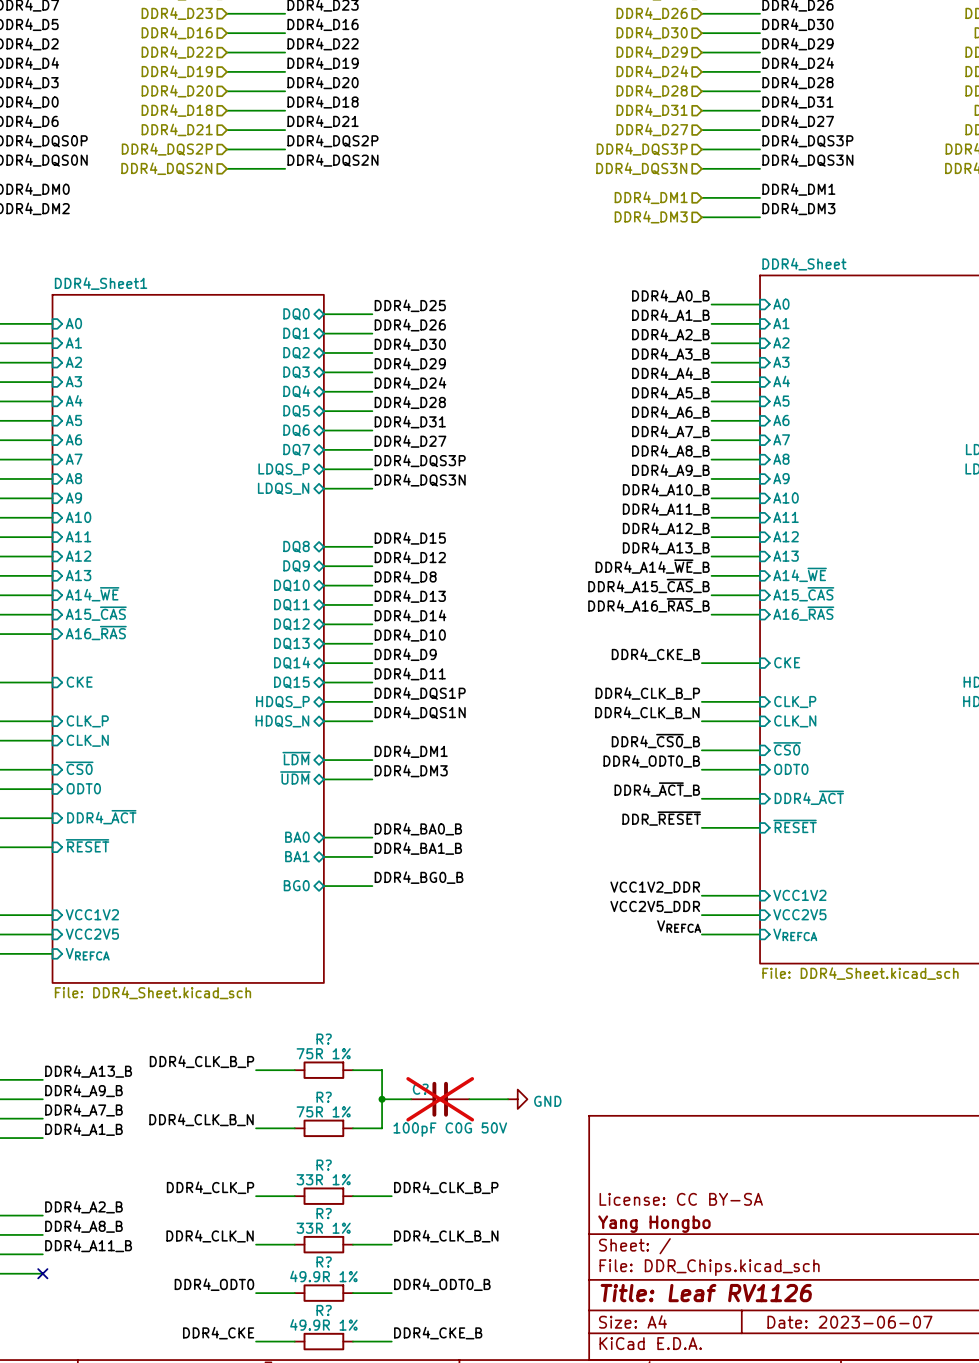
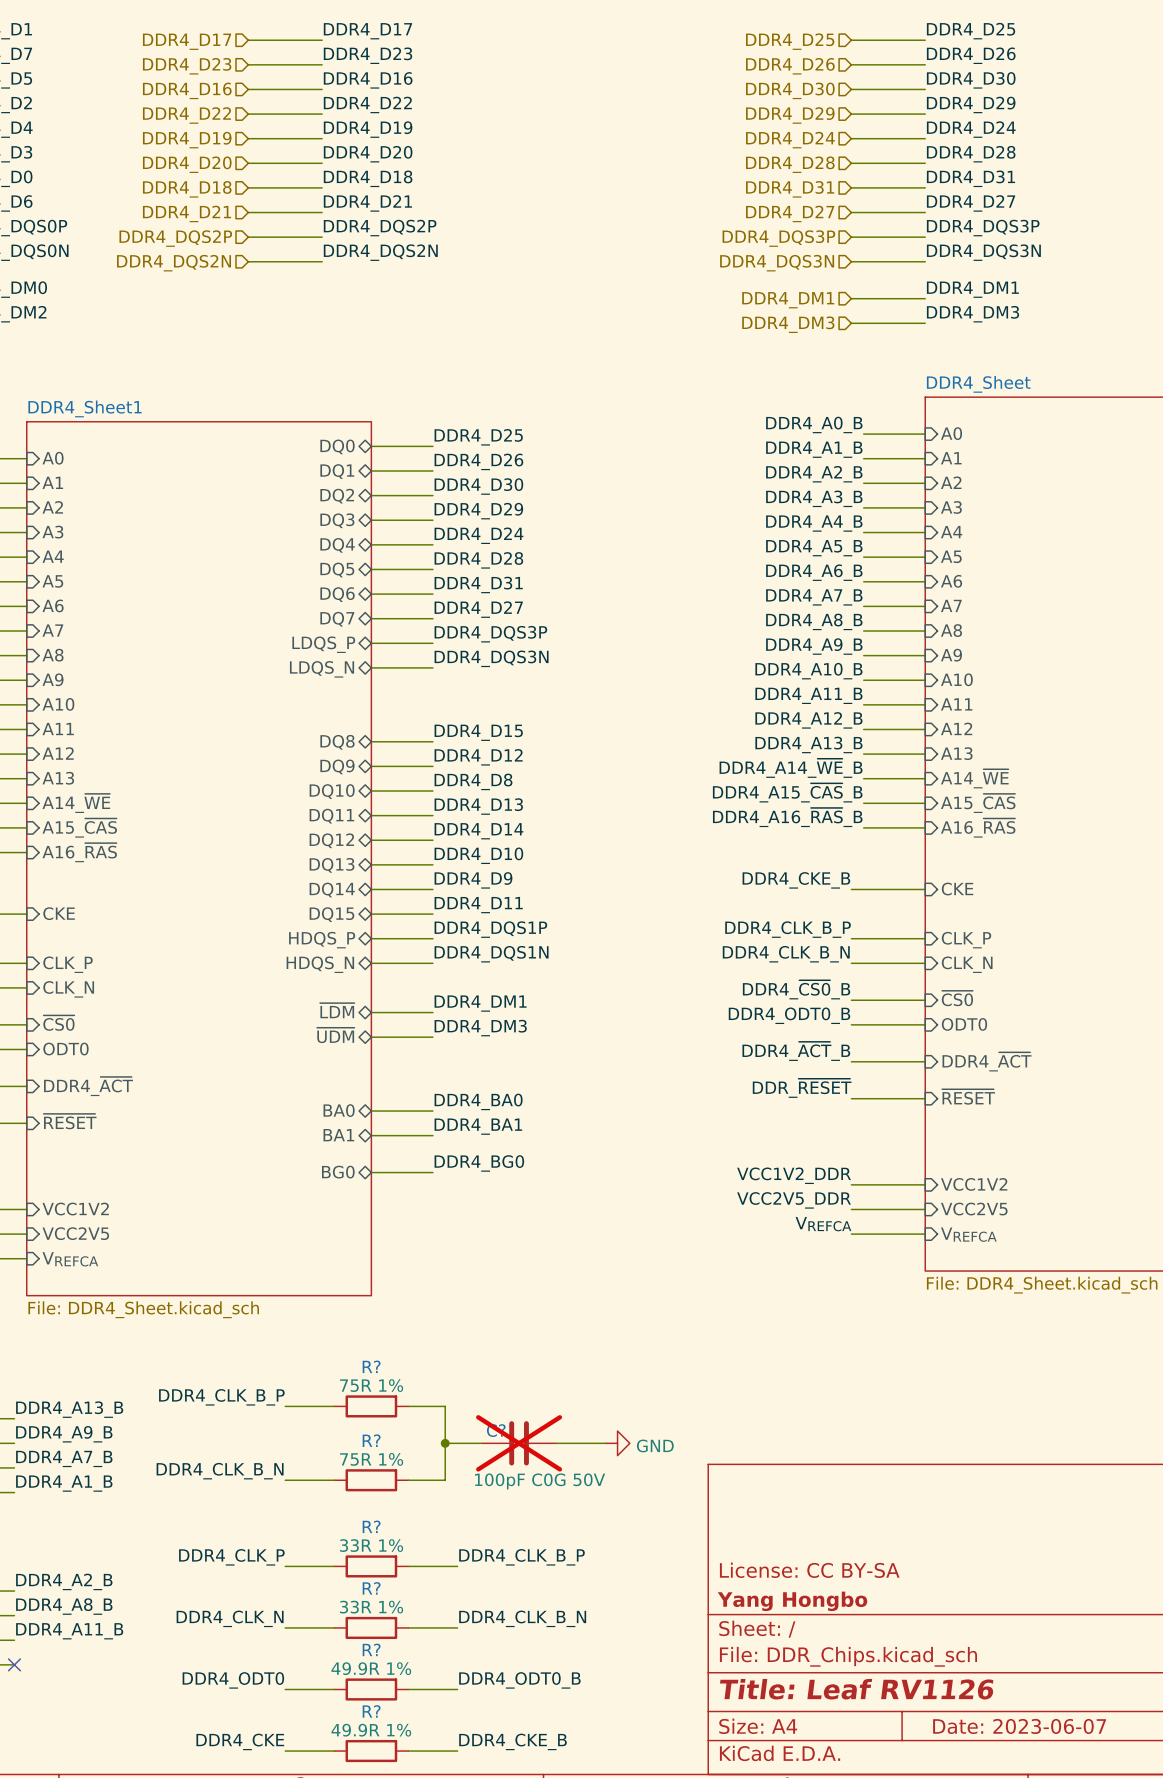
label: DDR4_BA0_B (418, 829) -> DDR4_BA0 (478, 1101)
label: DDR4_BA1_B (418, 848) -> DDR4_BA1 (478, 1126)
label: DDR4_BG0_B (419, 877) -> DDR4_BG0 (479, 1163)

